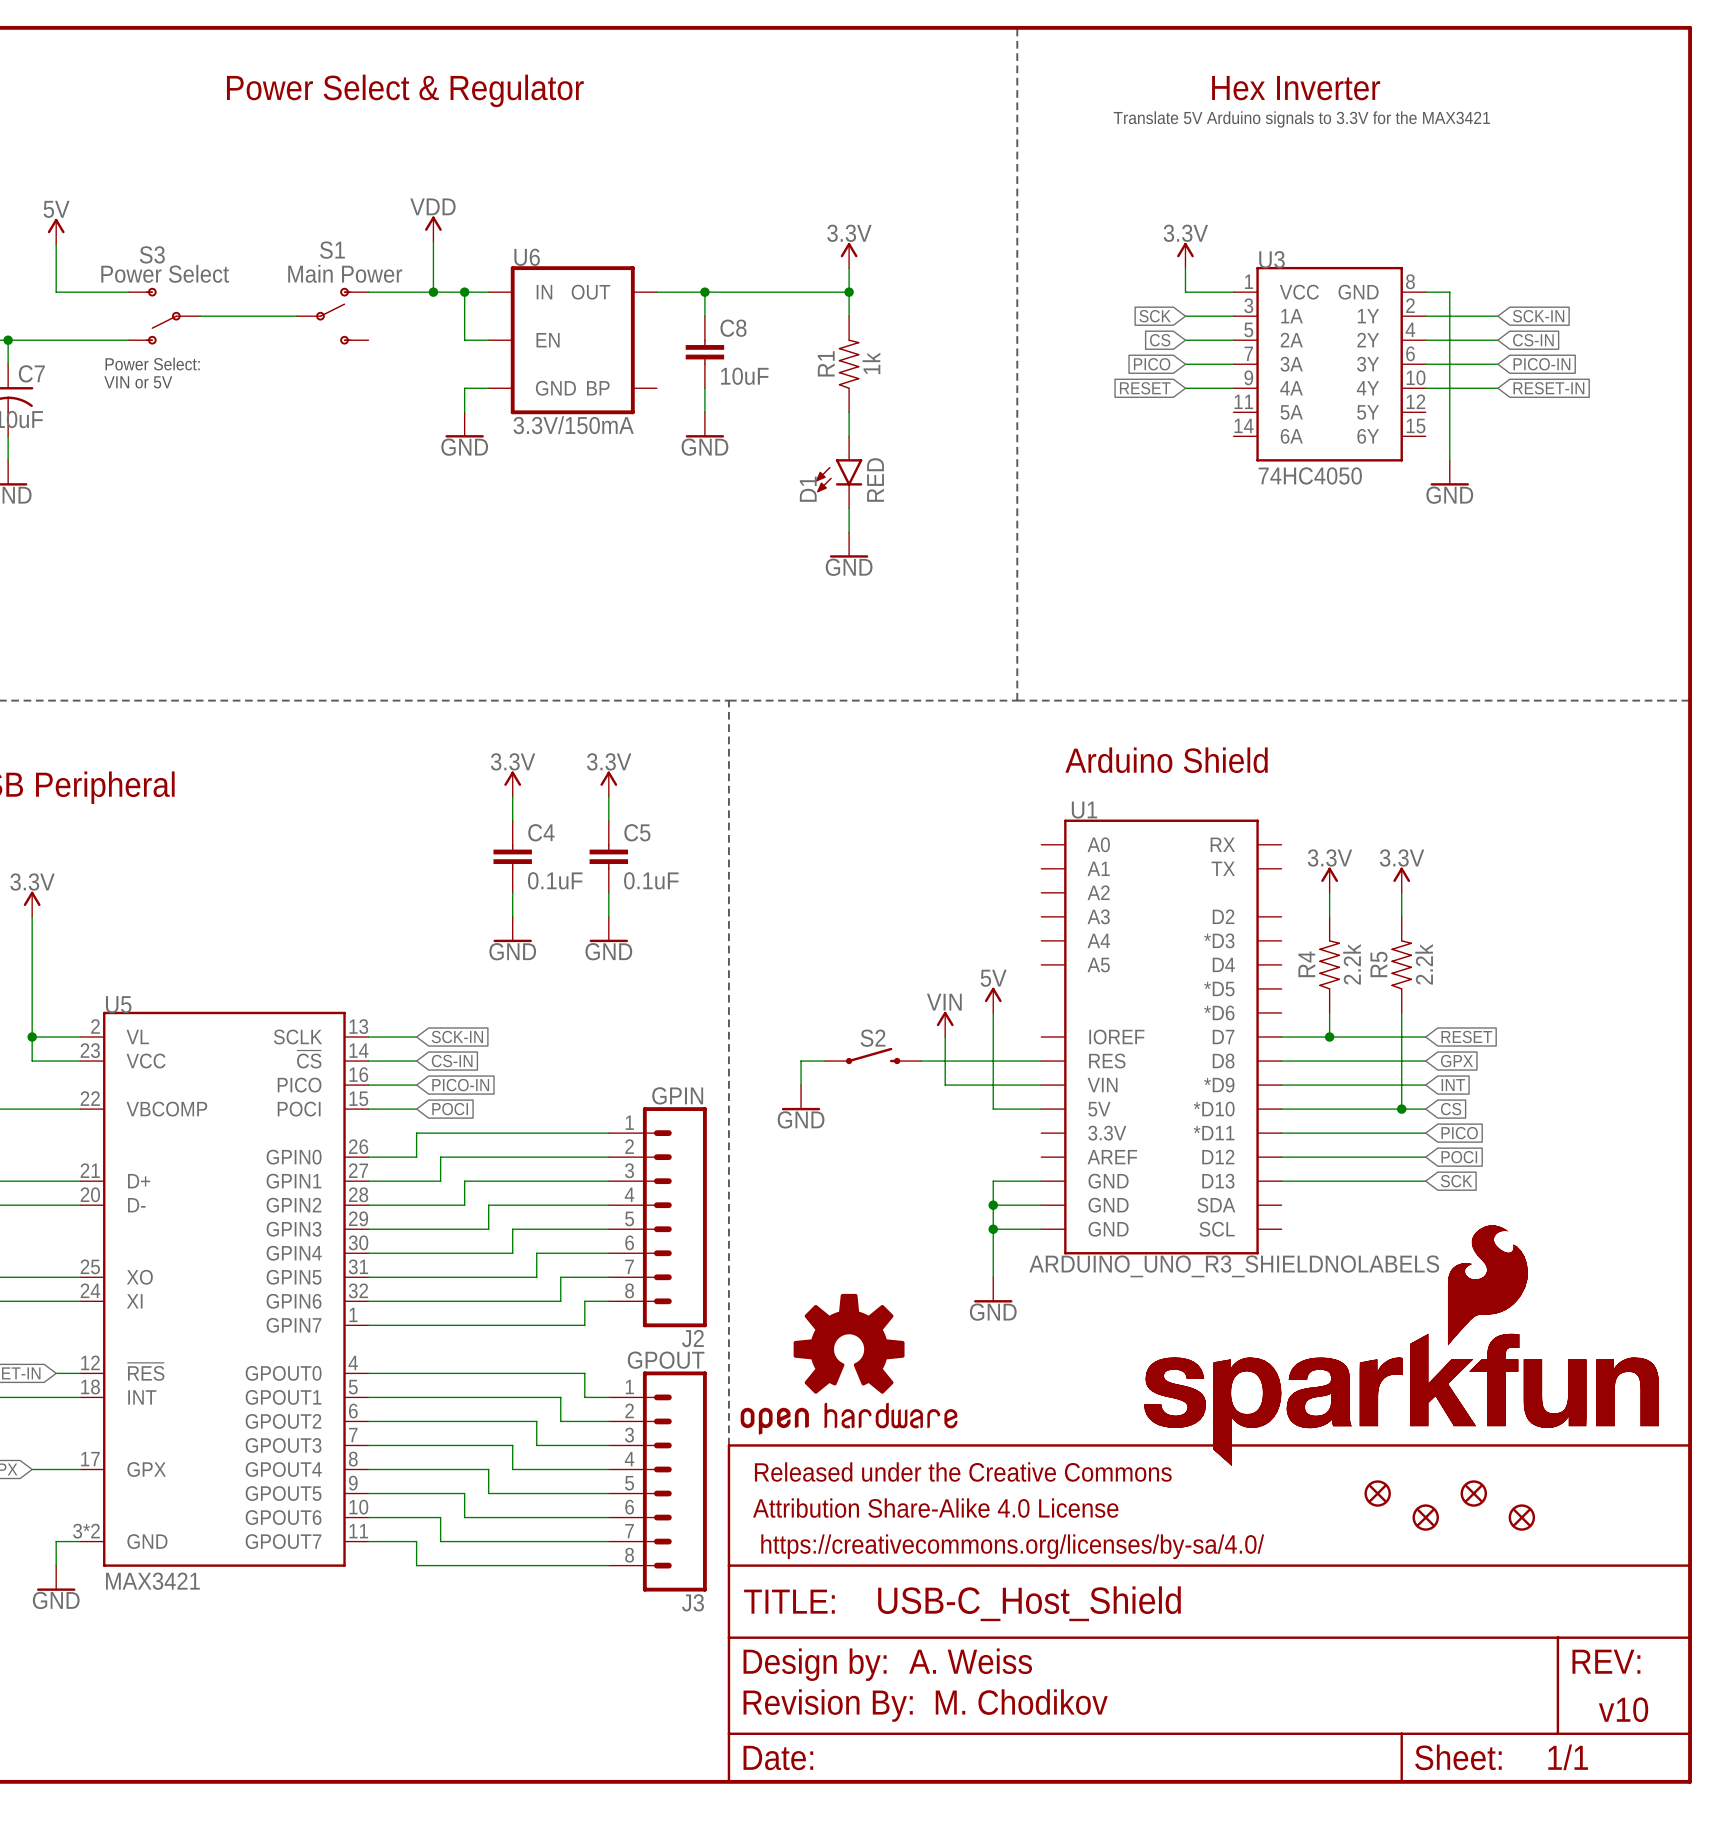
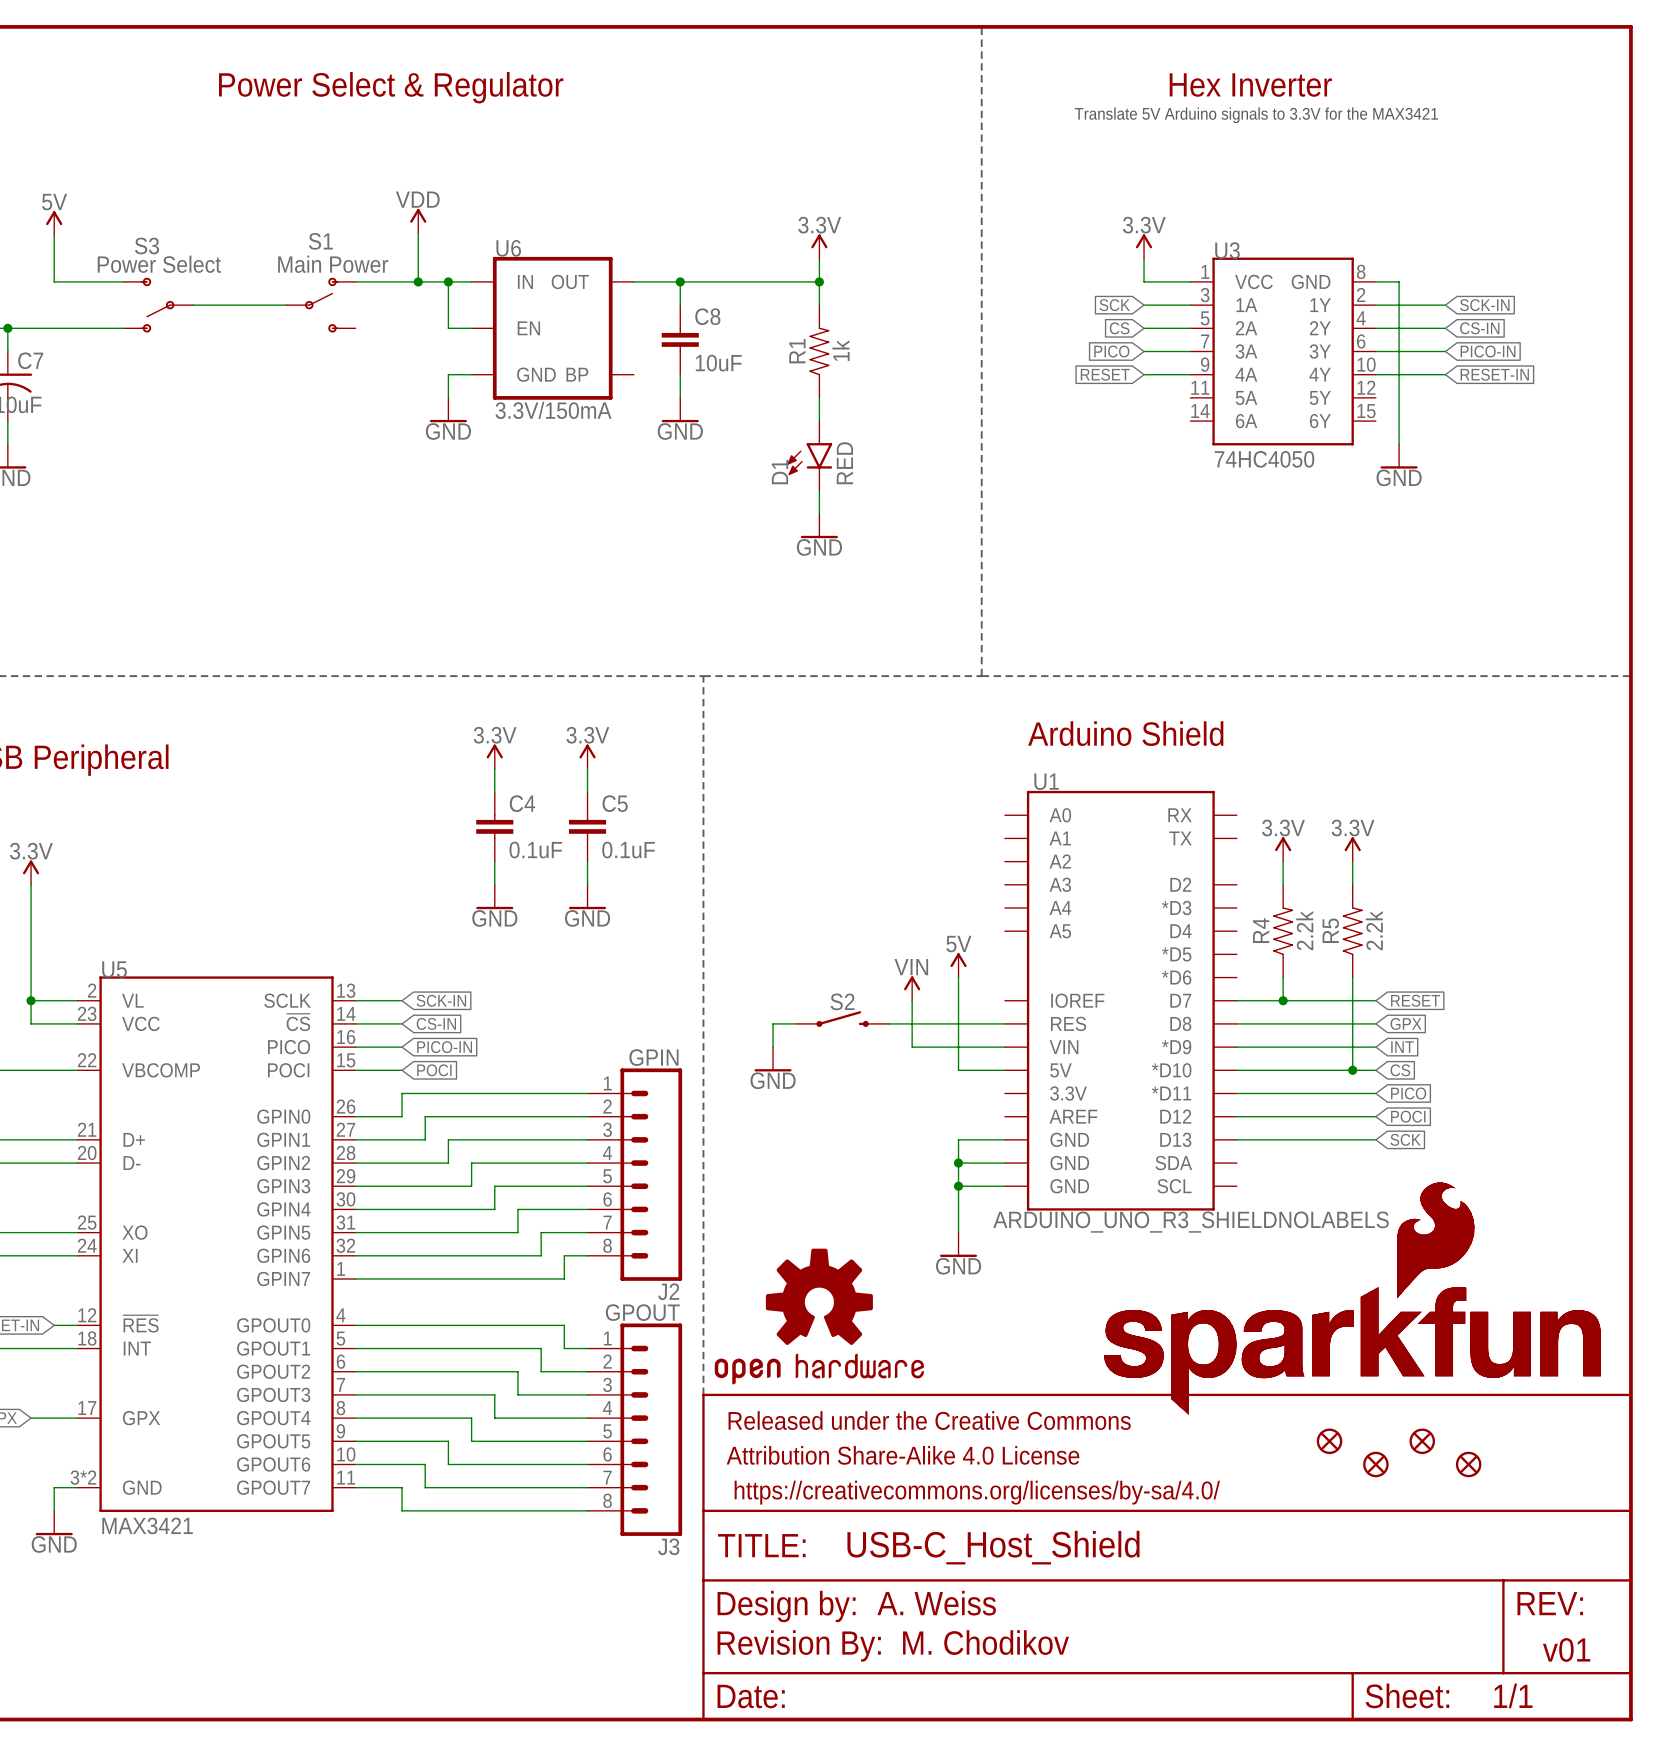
text: Power Select: (152, 364) -> none
text: VIN or 5V (138, 382) -> none
text: v10 (1623, 1709) -> v01 (1566, 1649)

